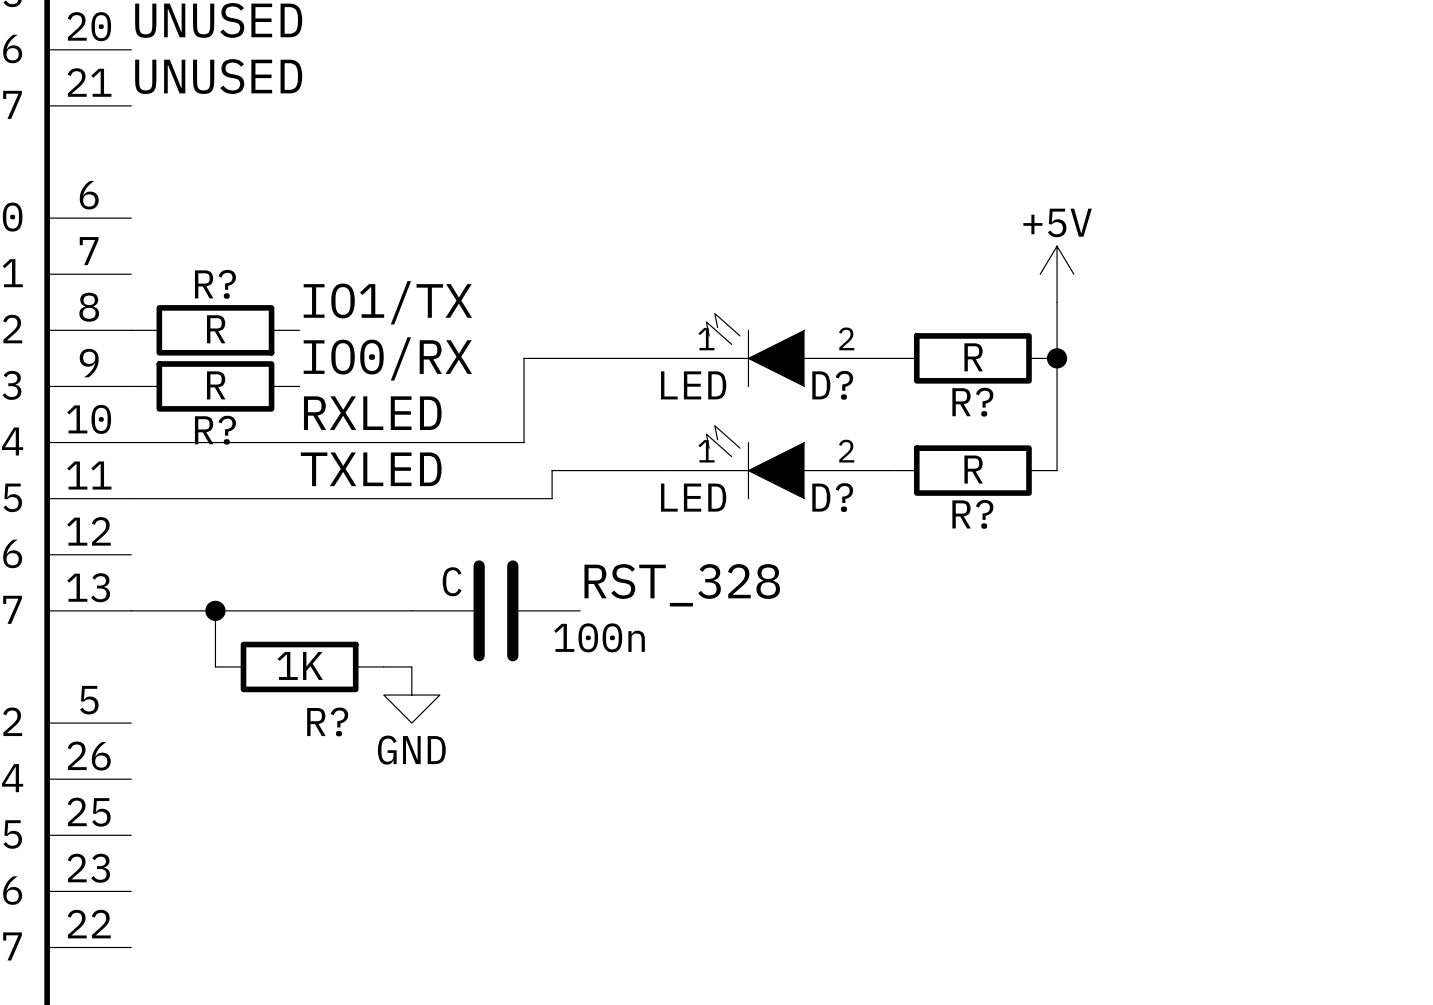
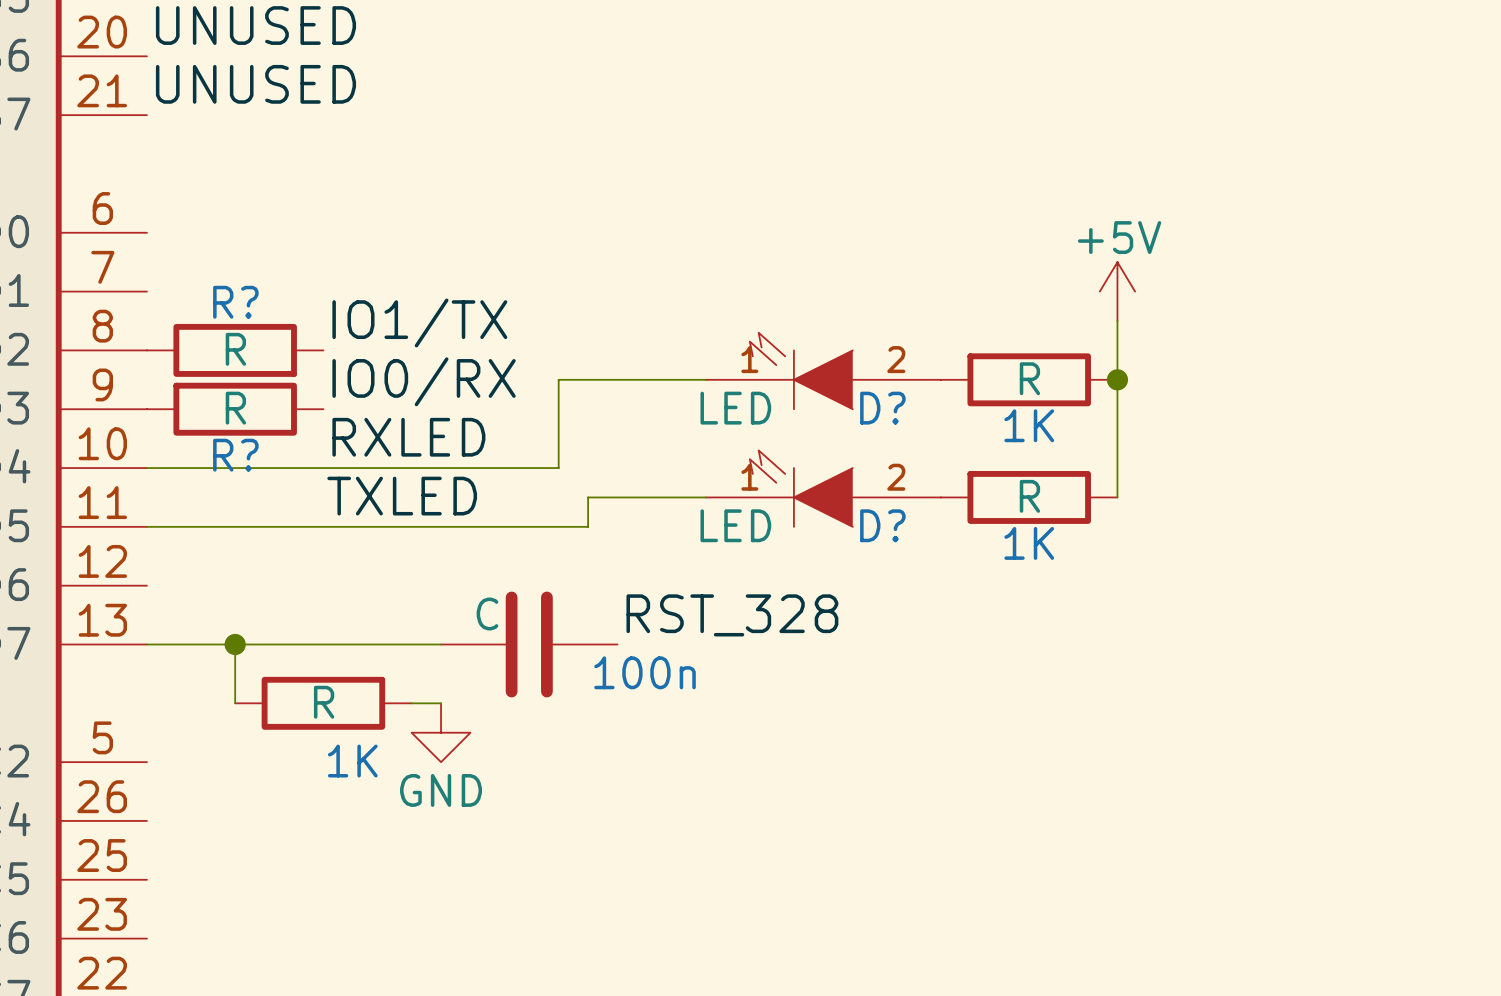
R? name: R? (972, 402) -> 1K (1029, 425)
R? name: R? (972, 514) -> 1K (1029, 543)
R? value: 1K (300, 665) -> R (324, 702)
R? name: R? (327, 721) -> 1K (352, 761)

